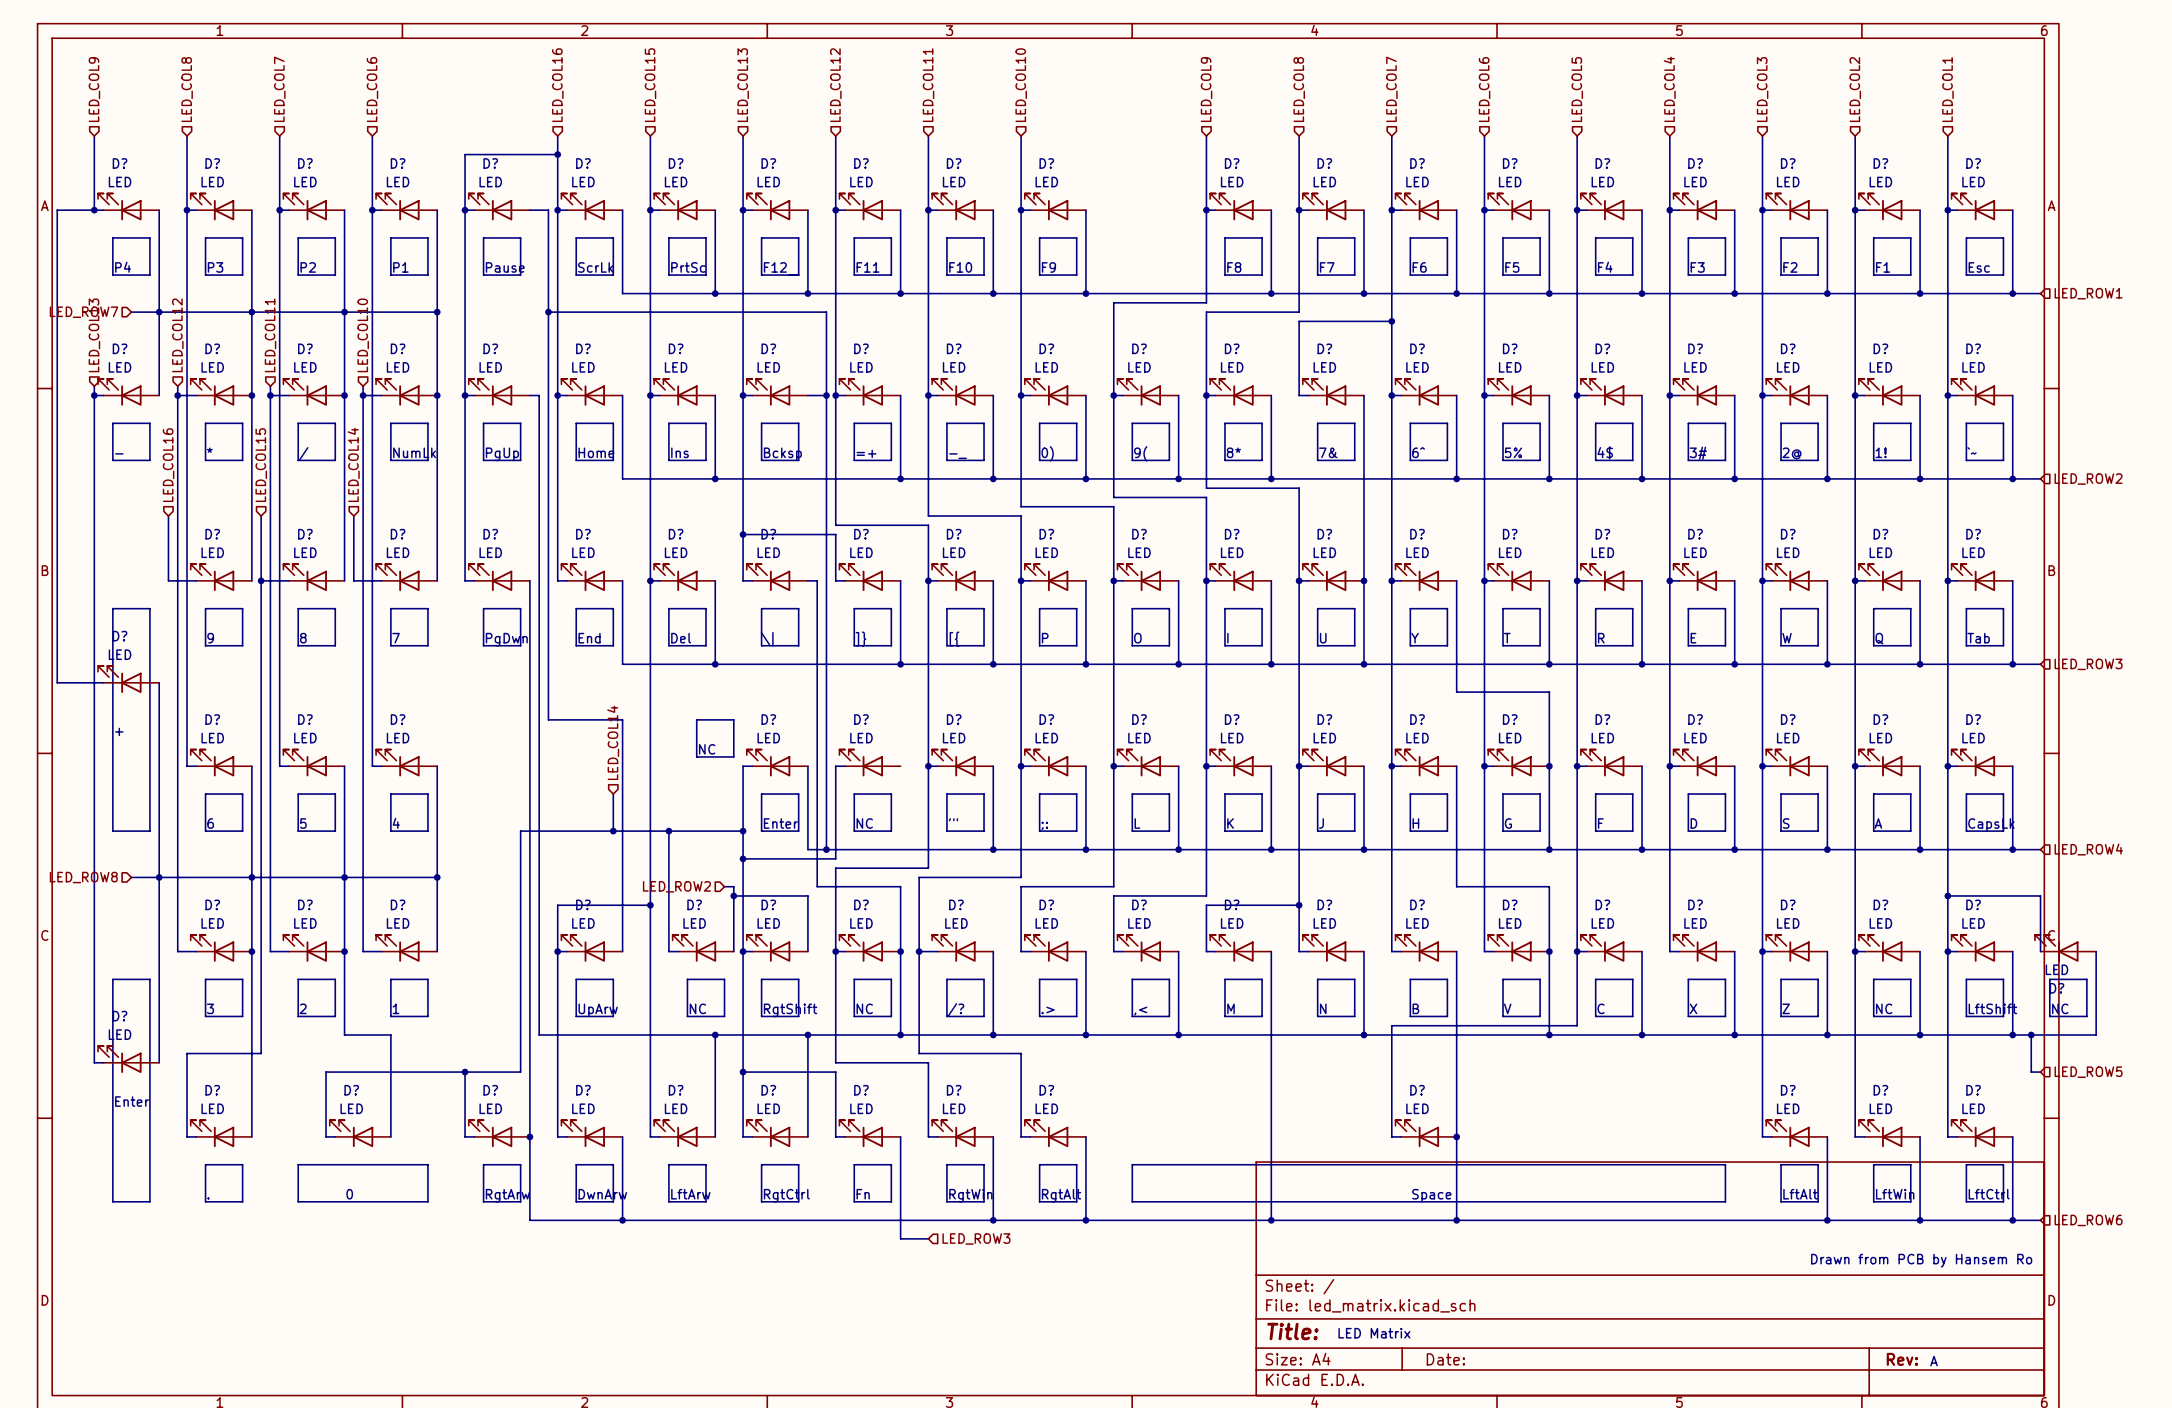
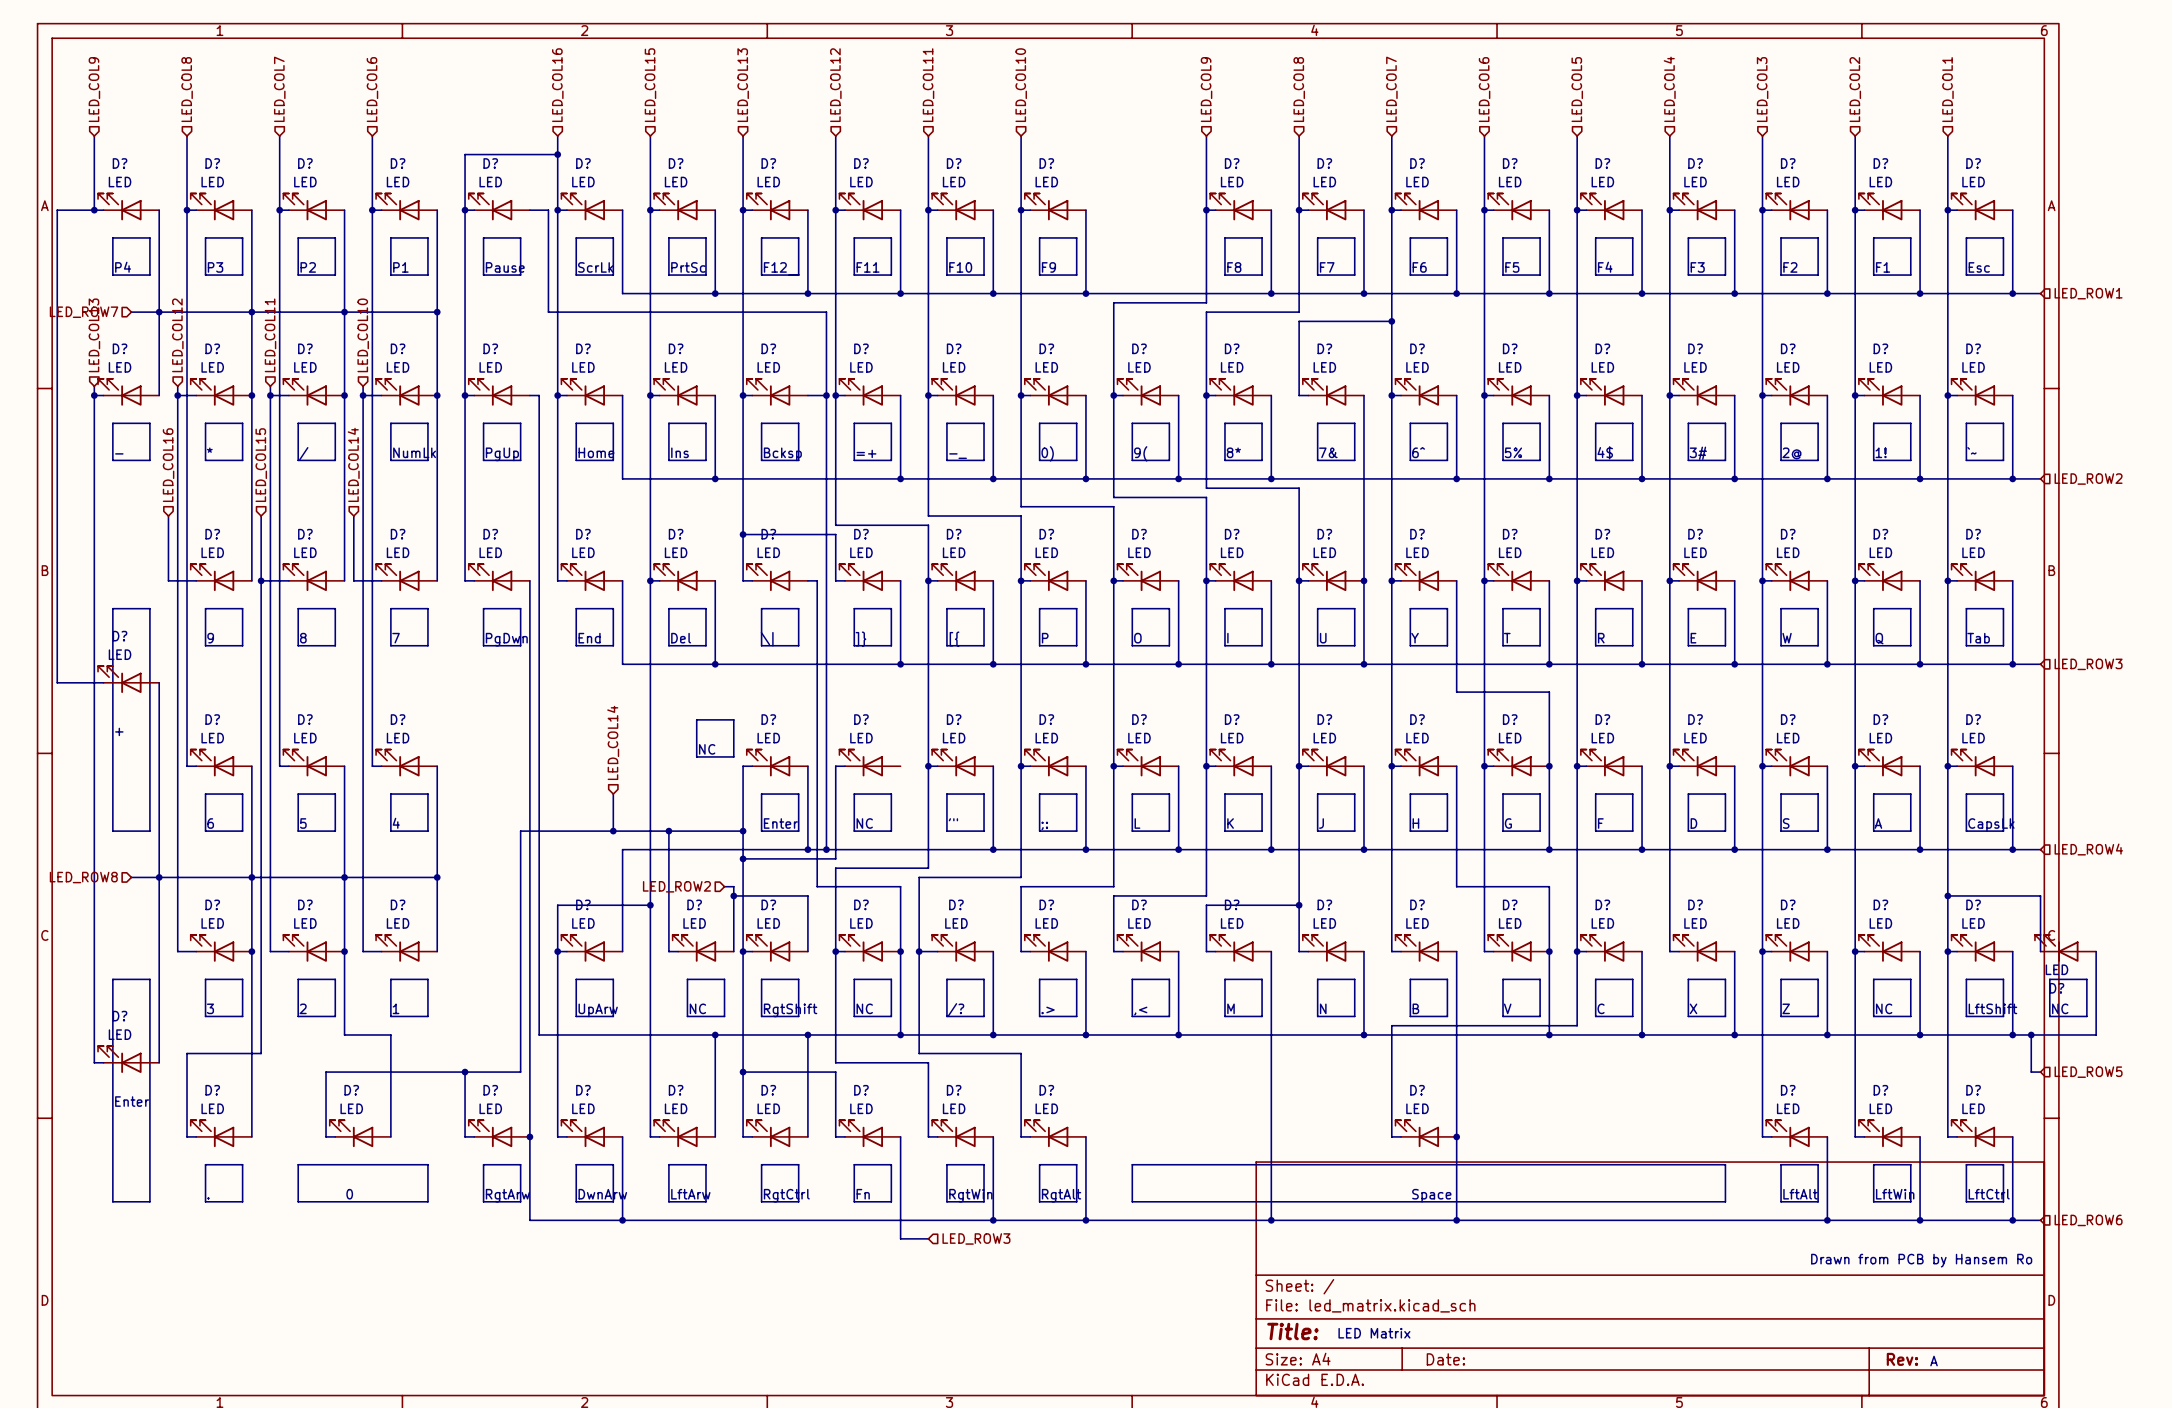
wire: (548, 312) (548, 719) (622, 719) (622, 849) -> (807, 849) (622, 849)
junction: (548, 312) -> none
junction: none -> (807, 849)

